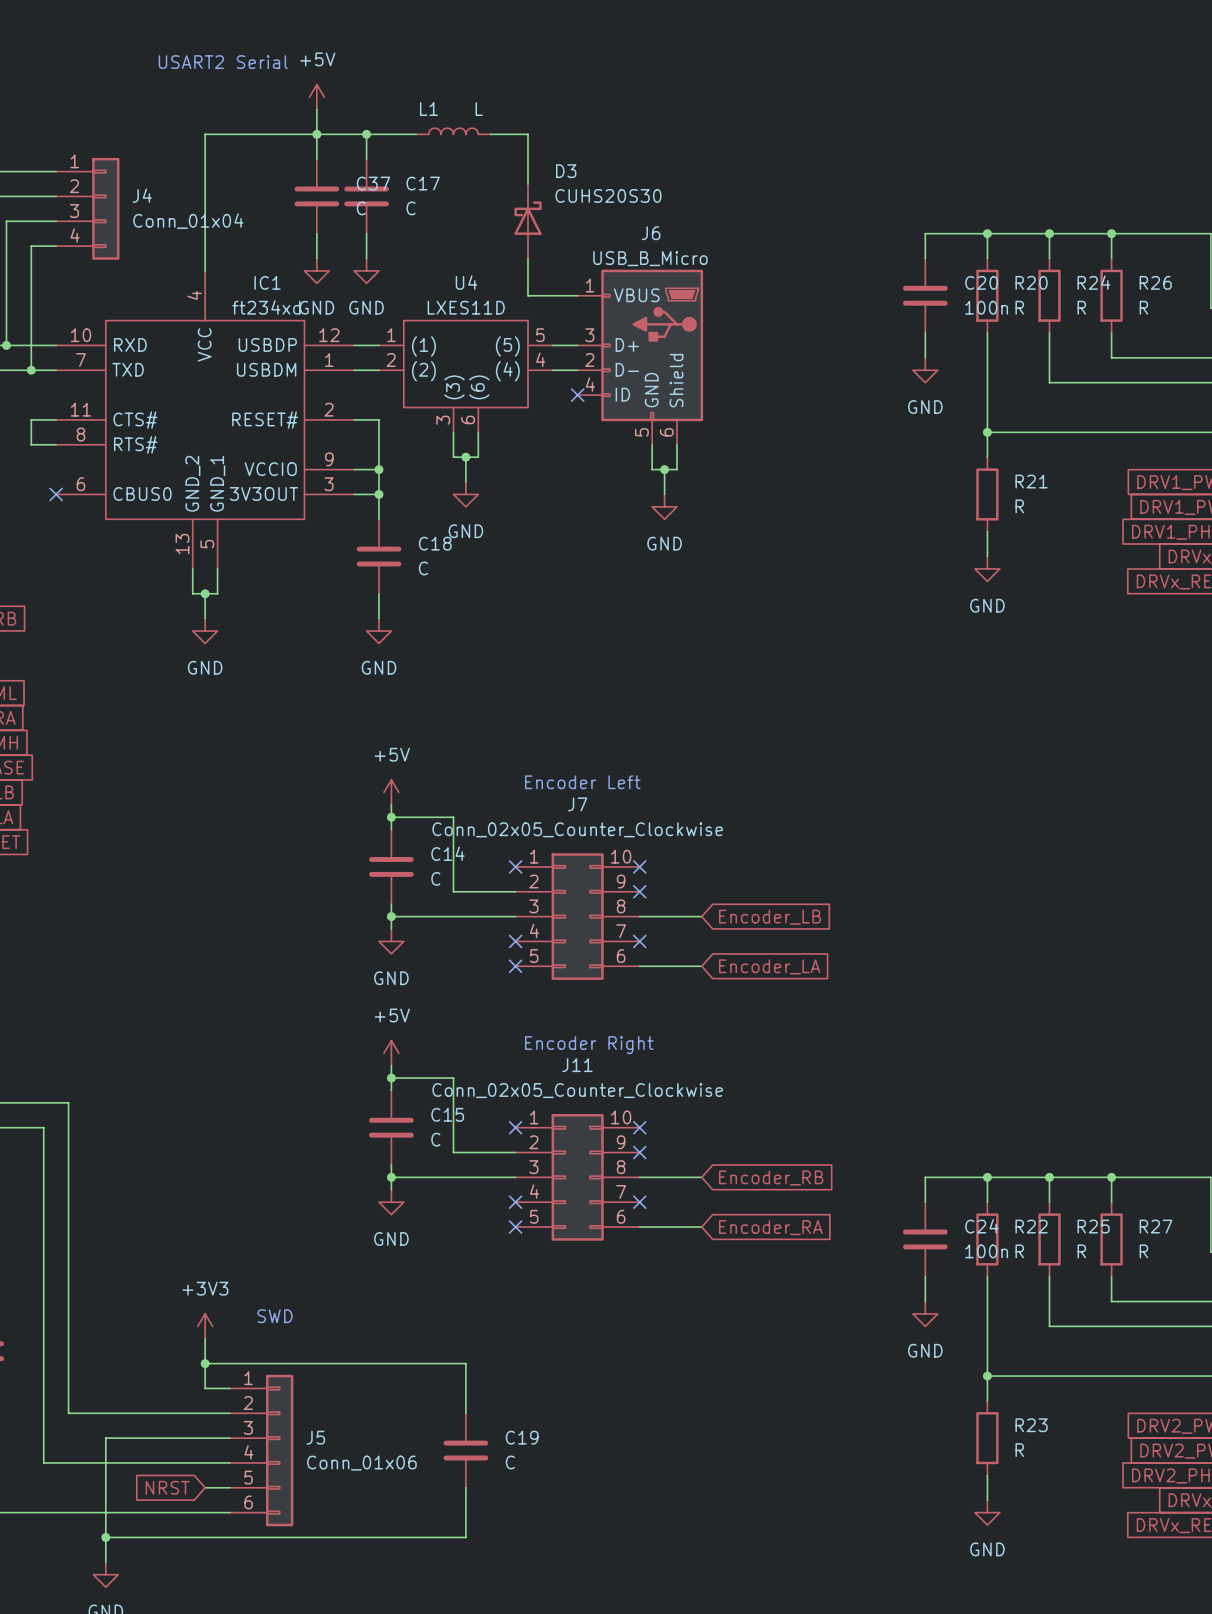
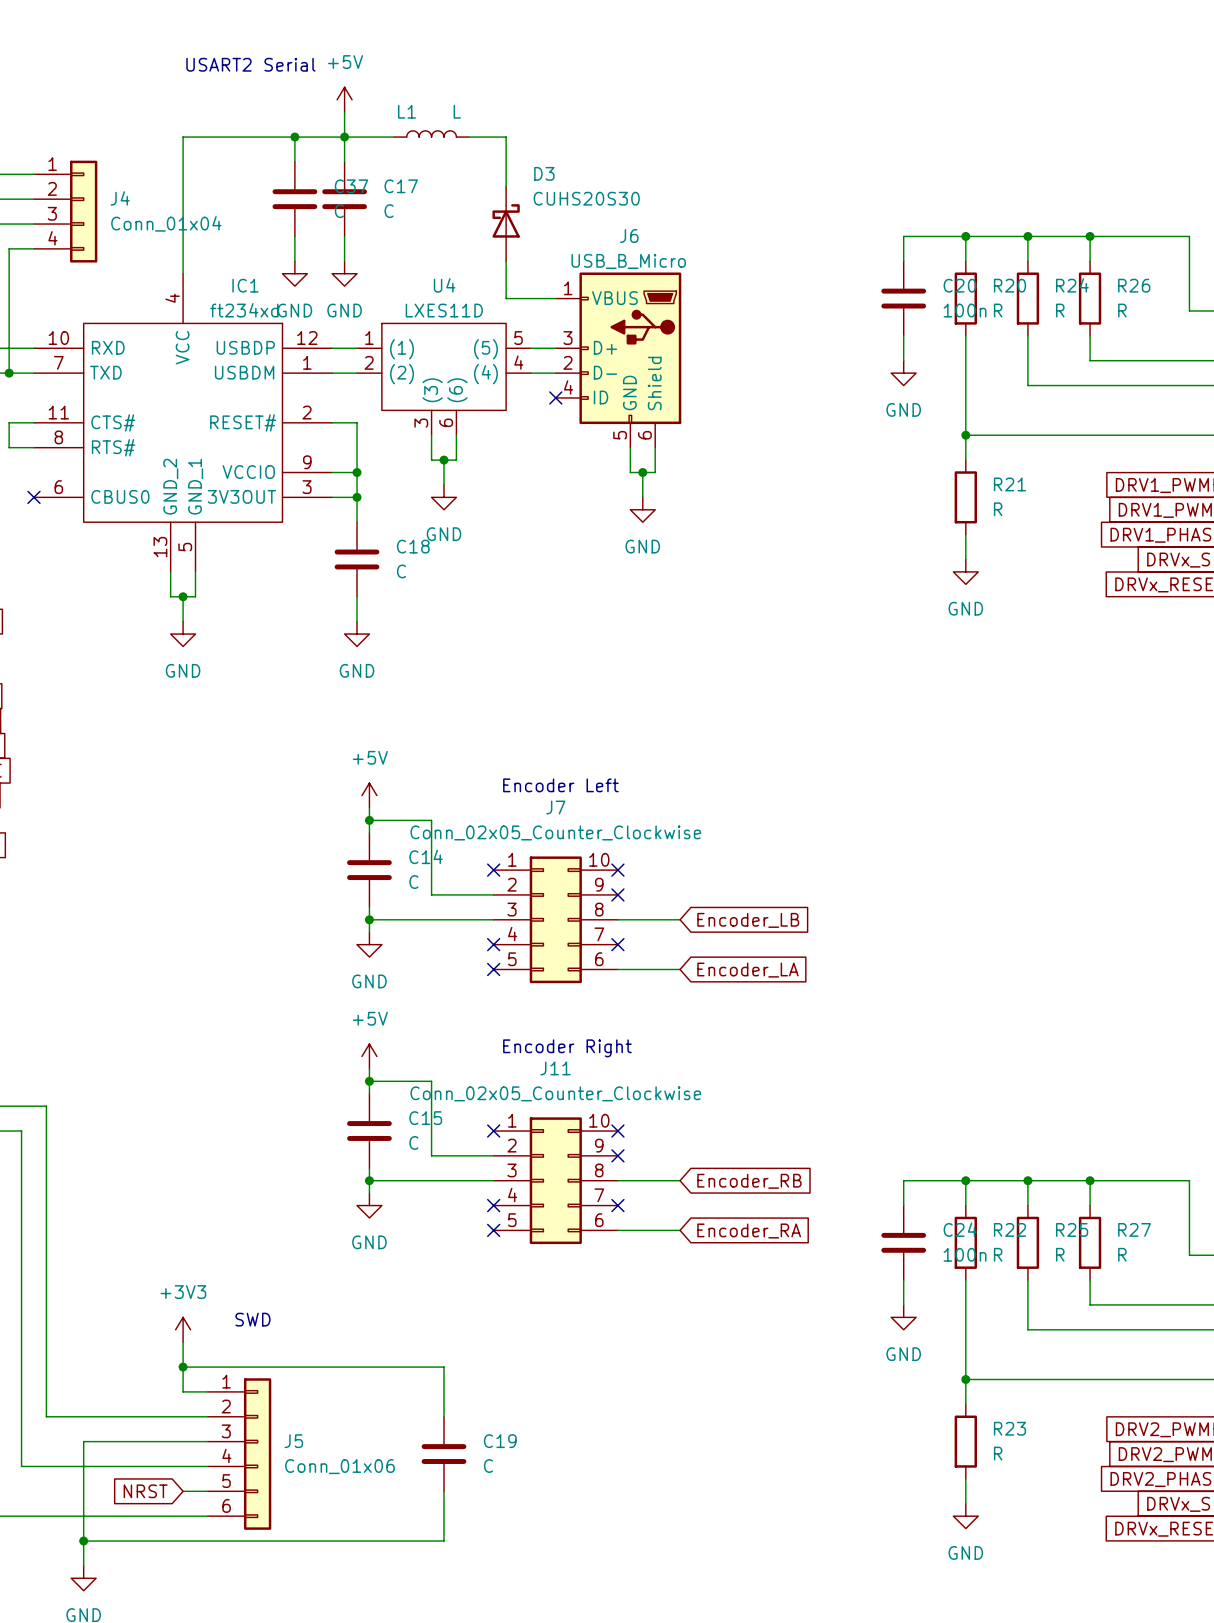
text position: USART2 Serial (223, 62) -> USART2 Serial (250, 64)
power symbol position: +5V (316, 97) -> +5V (344, 99)
wire: (316, 109) (316, 134) -> (344, 112) (344, 137)

